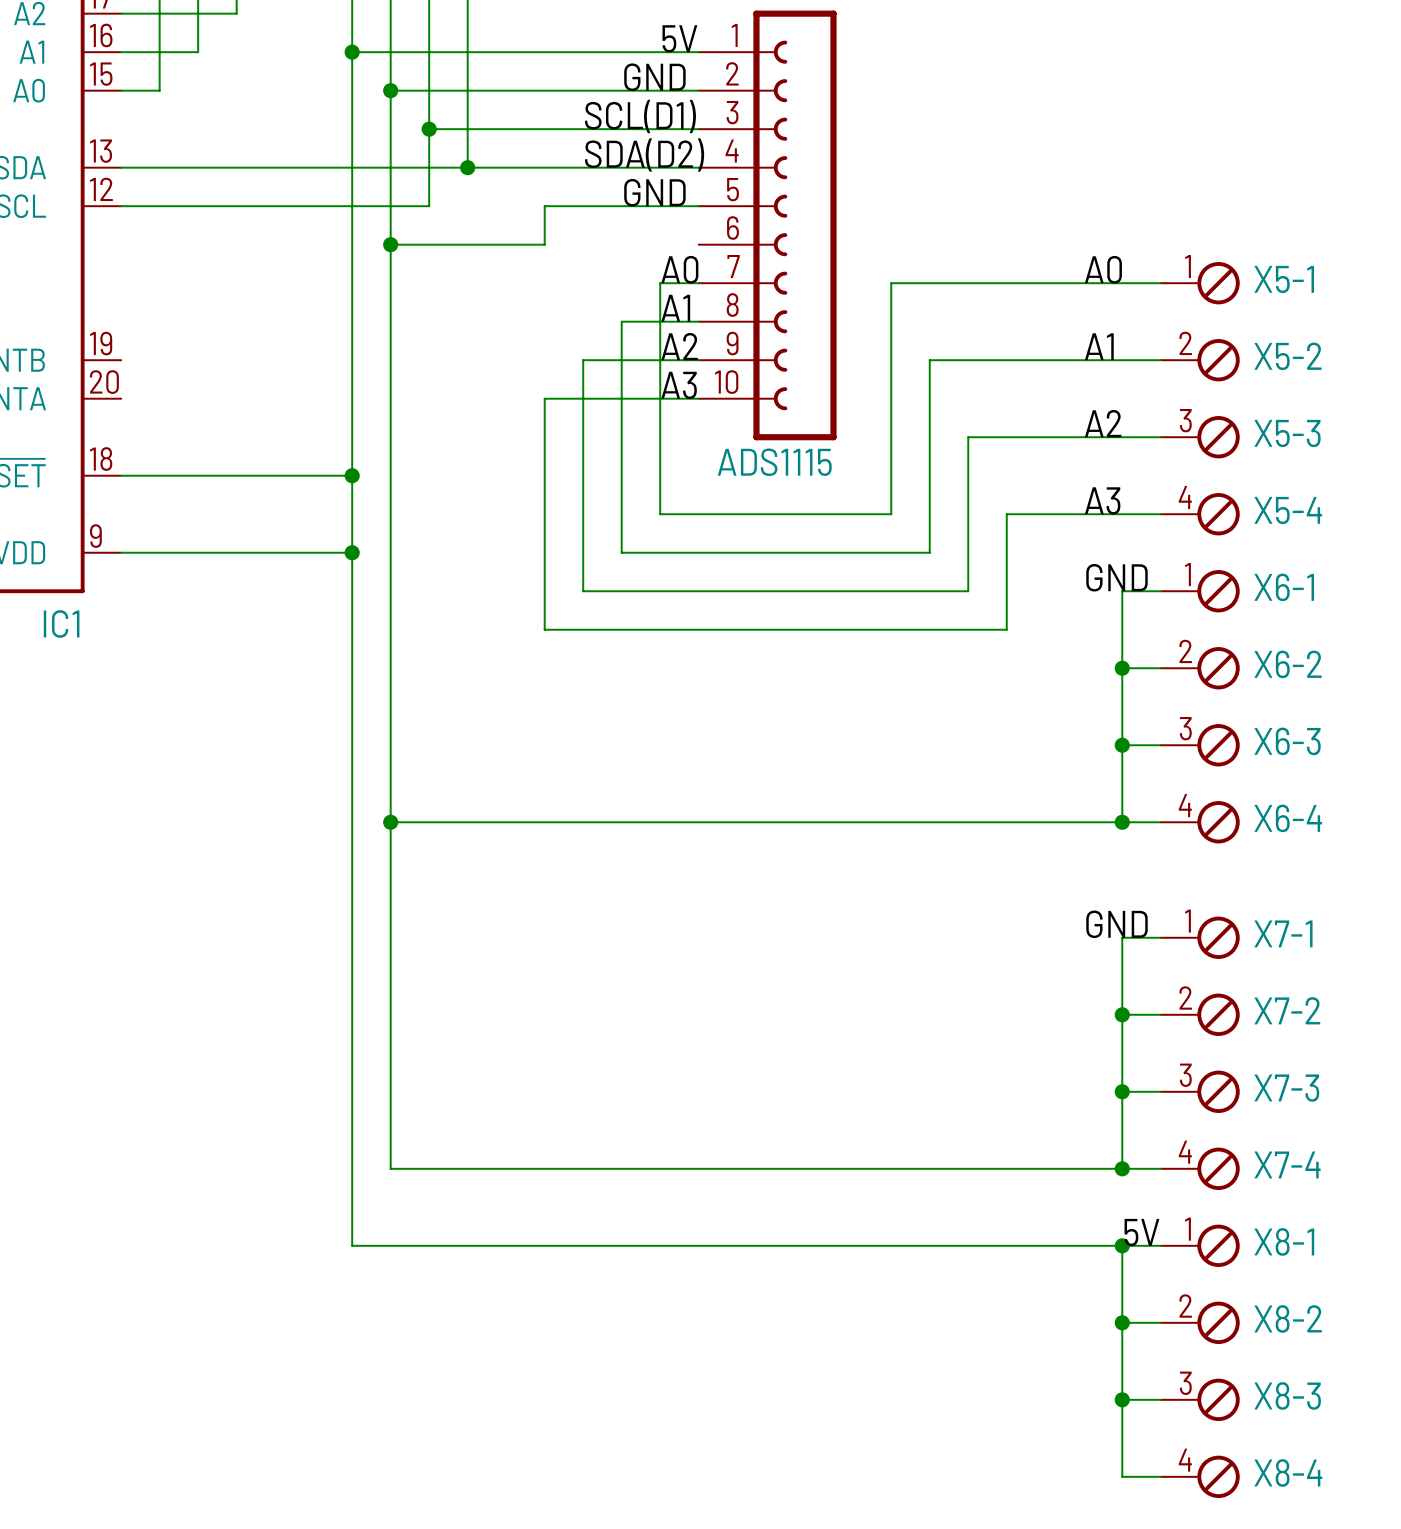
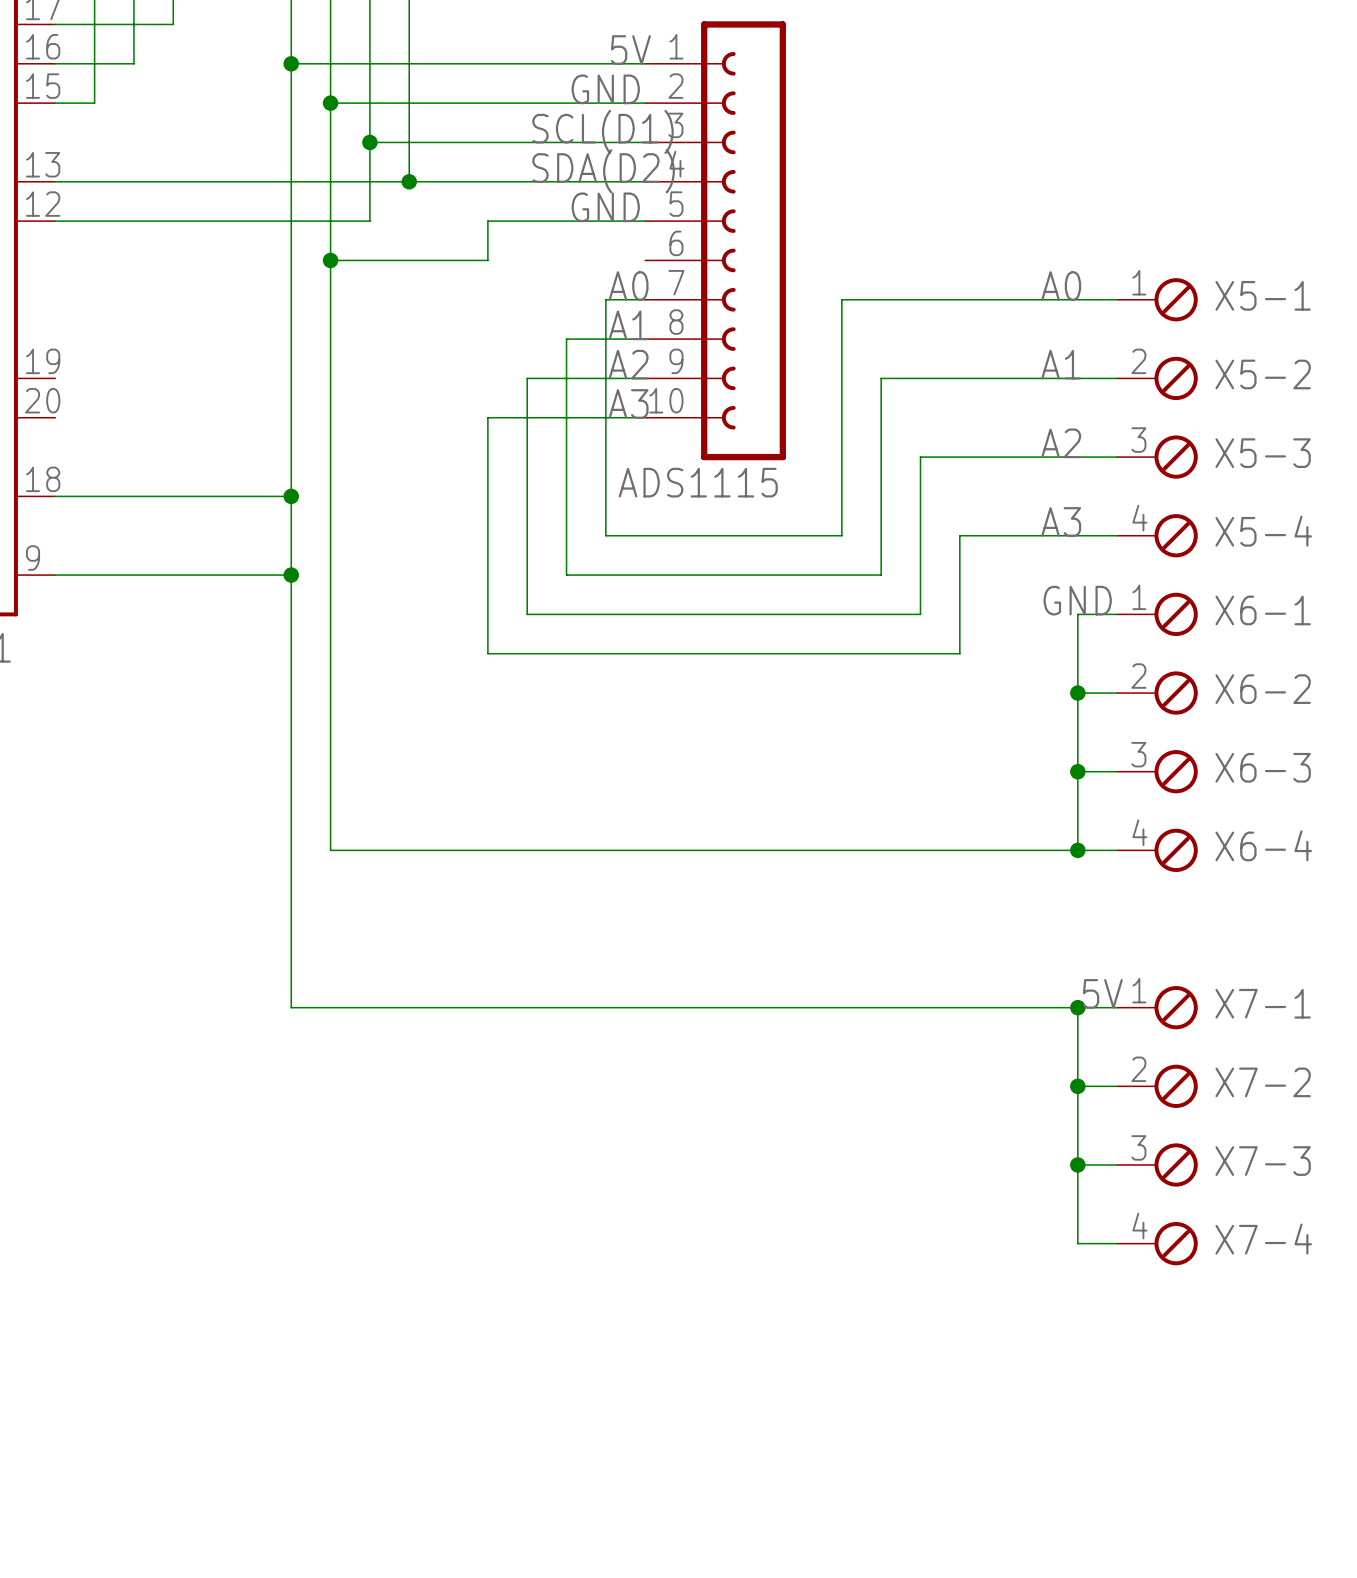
wire: (390, 822) (390, 1168) (1160, 1168) -> none
junction: (390, 822) -> none
label: GND (1116, 924) -> none
wire: (1160, 937) (1122, 937) (1122, 976) -> none
X7-1 position: (1200, 937) -> (1157, 1007)
wire: (352, 976) (352, 1245) (1160, 1245) -> (291, 1007) (1117, 1007)
junction: none -> (1077, 1007)
wire: (1122, 1014) (1160, 1014) -> (1077, 1086) (1117, 1086)
junction: (1122, 1014) -> none
X7-2 position: (1200, 1014) -> (1157, 1086)
junction: none -> (1077, 1086)
wire: (1122, 1091) (1160, 1091) -> (1077, 1164) (1117, 1164)
junction: (1122, 1091) -> none
X7-3 position: (1200, 1091) -> (1157, 1164)
junction: none -> (1077, 1164)
wire: none -> (1077, 1204) (1077, 1243) (1117, 1243)
junction: (1122, 1168) -> none
X7-4 position: (1200, 1168) -> (1157, 1243)
label position: 5V (1141, 1232) -> 5V (1102, 993)
wire: (1122, 1245) (1122, 1476) (1160, 1476) -> none
junction: (1122, 1245) -> none
X8-1: (1200, 1245) -> none
wire: (1122, 1322) (1160, 1322) -> none
junction: (1122, 1322) -> none
X8-2: (1200, 1322) -> none
wire: (1122, 1399) (1160, 1399) -> none
junction: (1122, 1399) -> none
X8-3: (1200, 1399) -> none
X8-4: (1200, 1476) -> none

